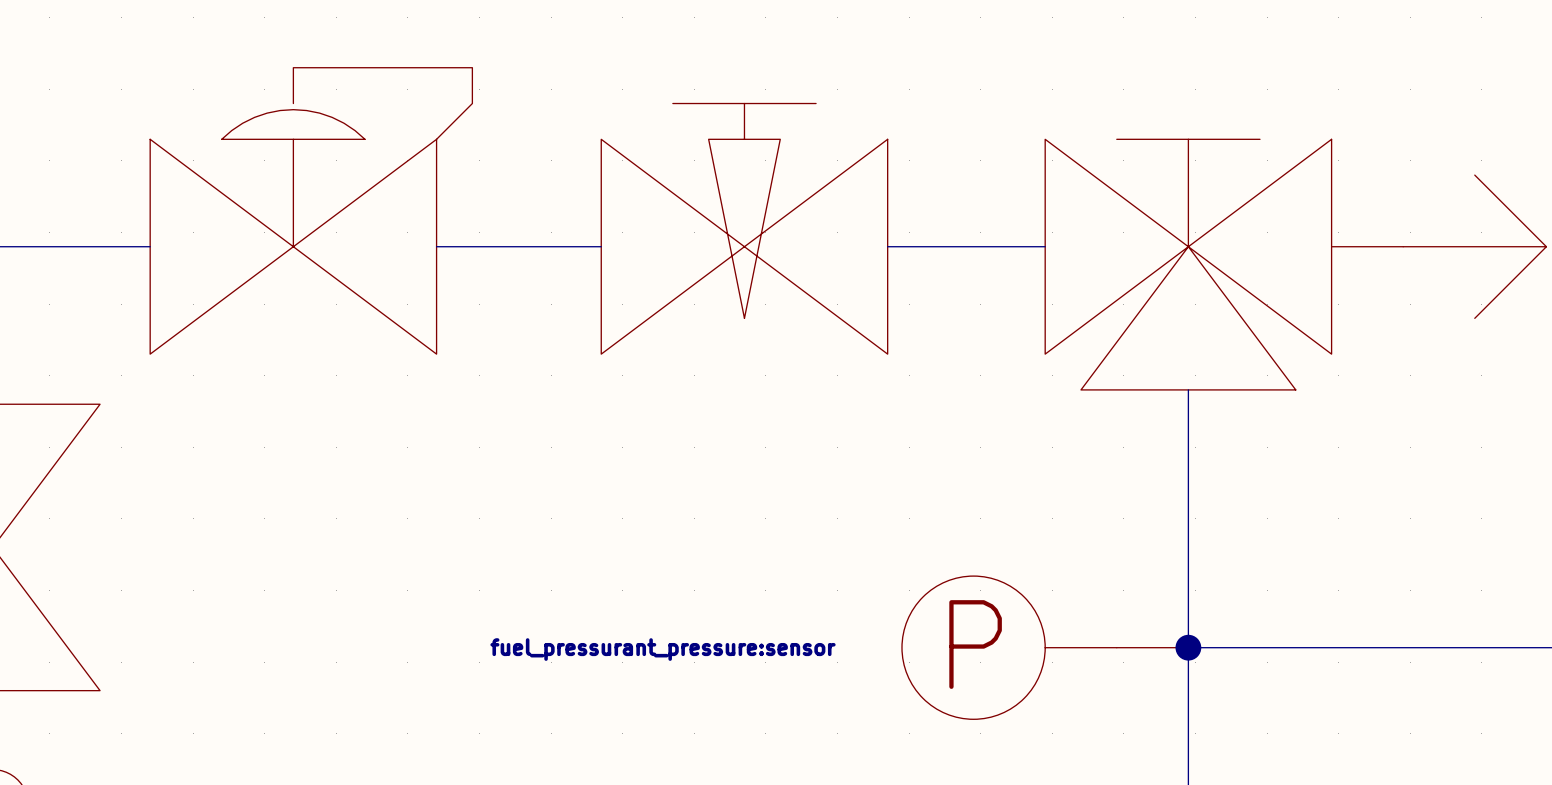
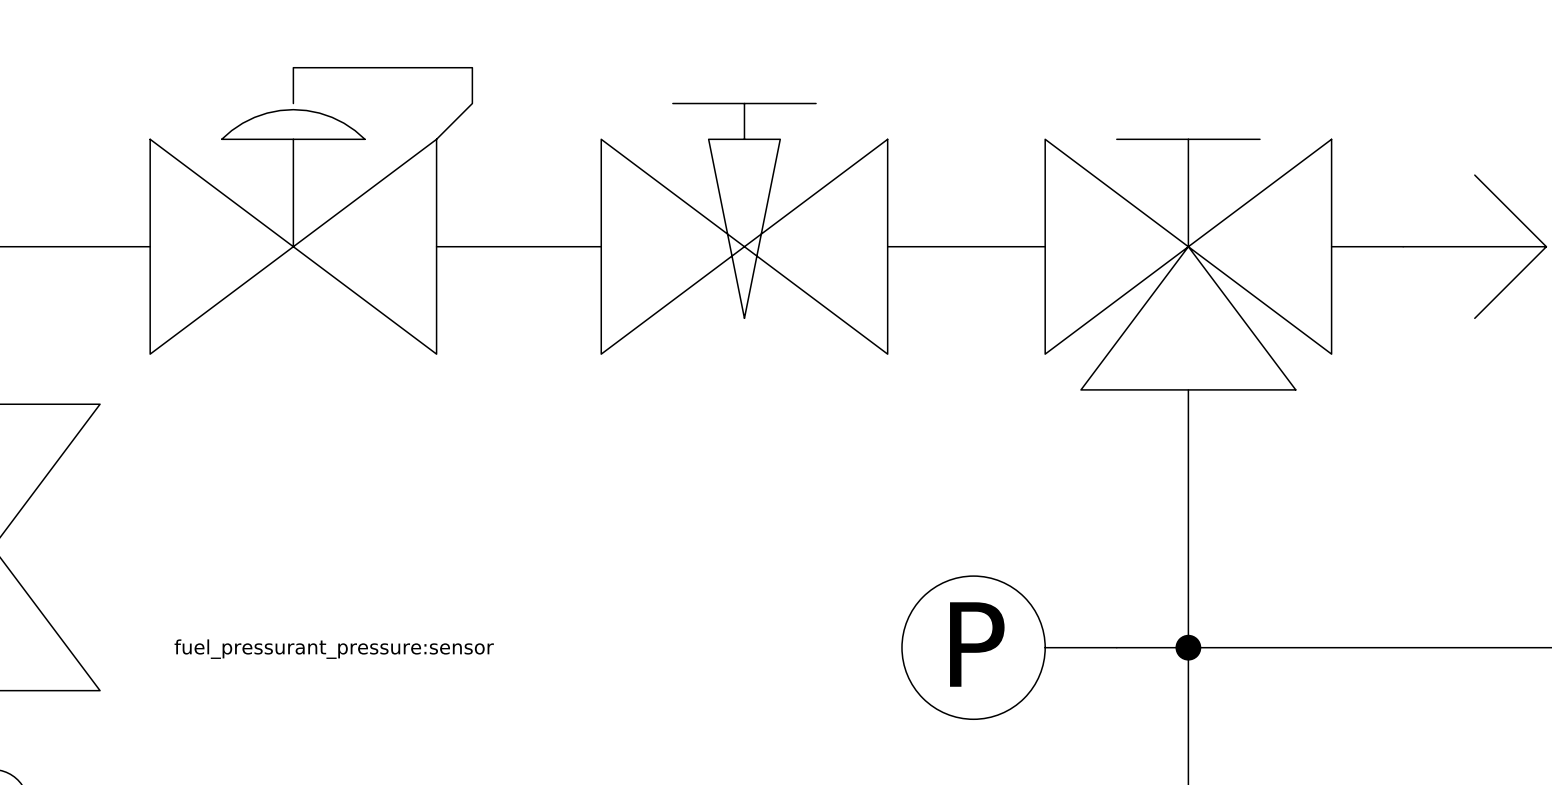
part value position: fuel_pressurant_pressure:sensor (663, 649) -> fuel_pressurant_pressure:sensor (334, 649)

